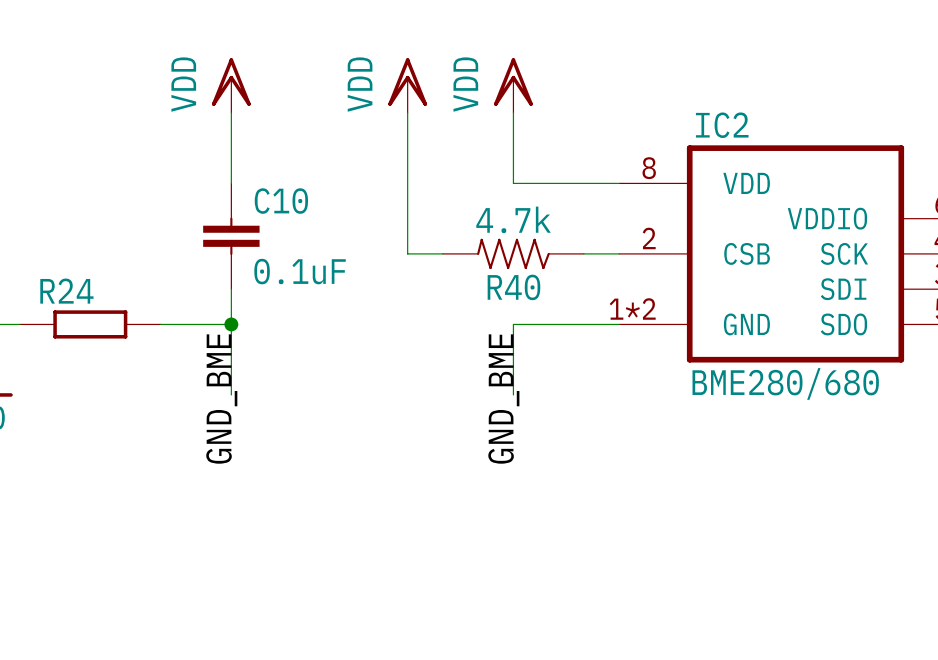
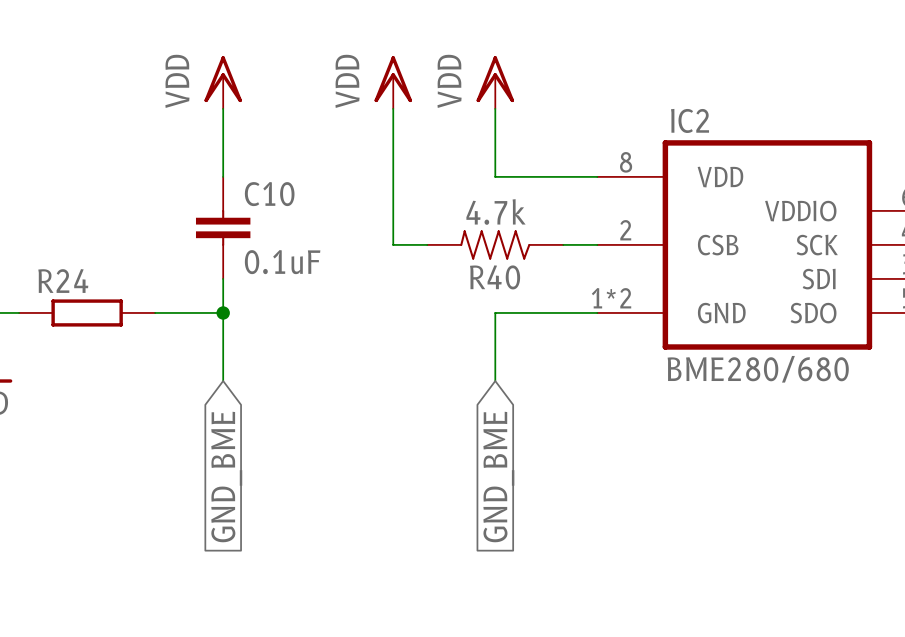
label: GND_BME (221, 399) -> none
label: GND_BME (503, 399) -> none
global label: none -> GND_BME (226, 477)
global label: none -> GND_BME (498, 477)

